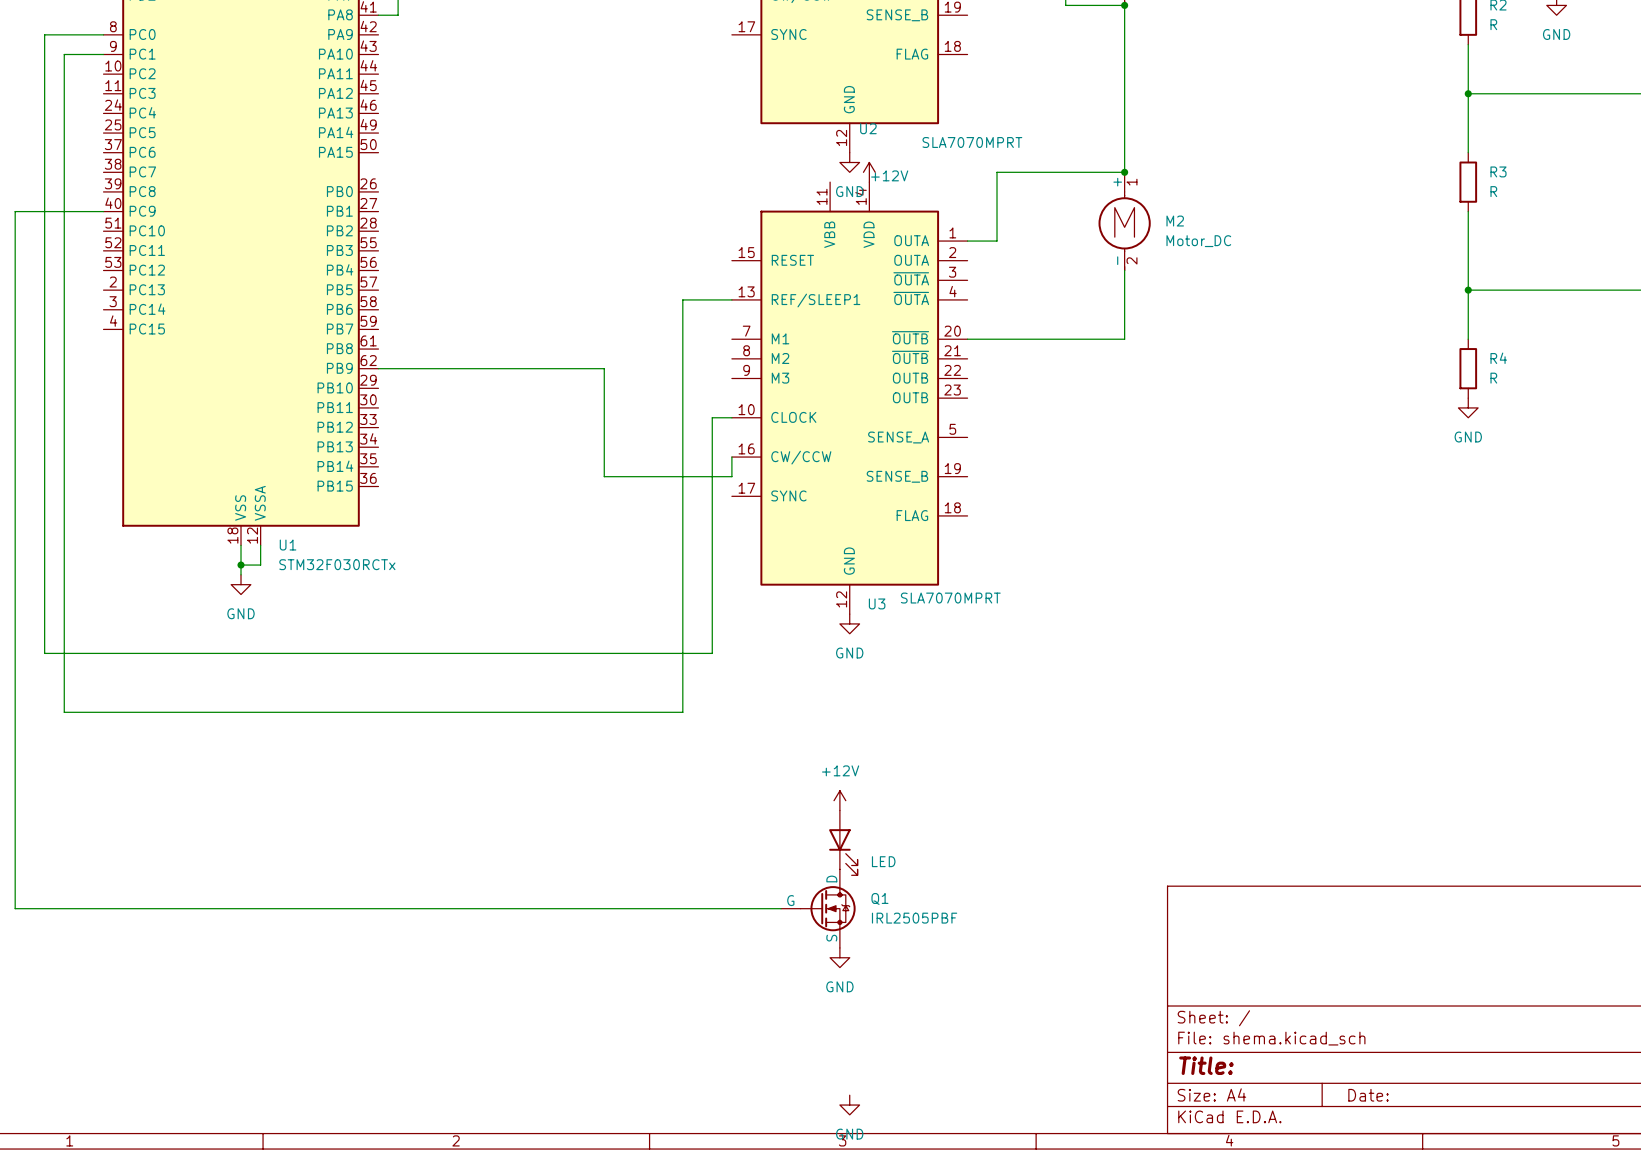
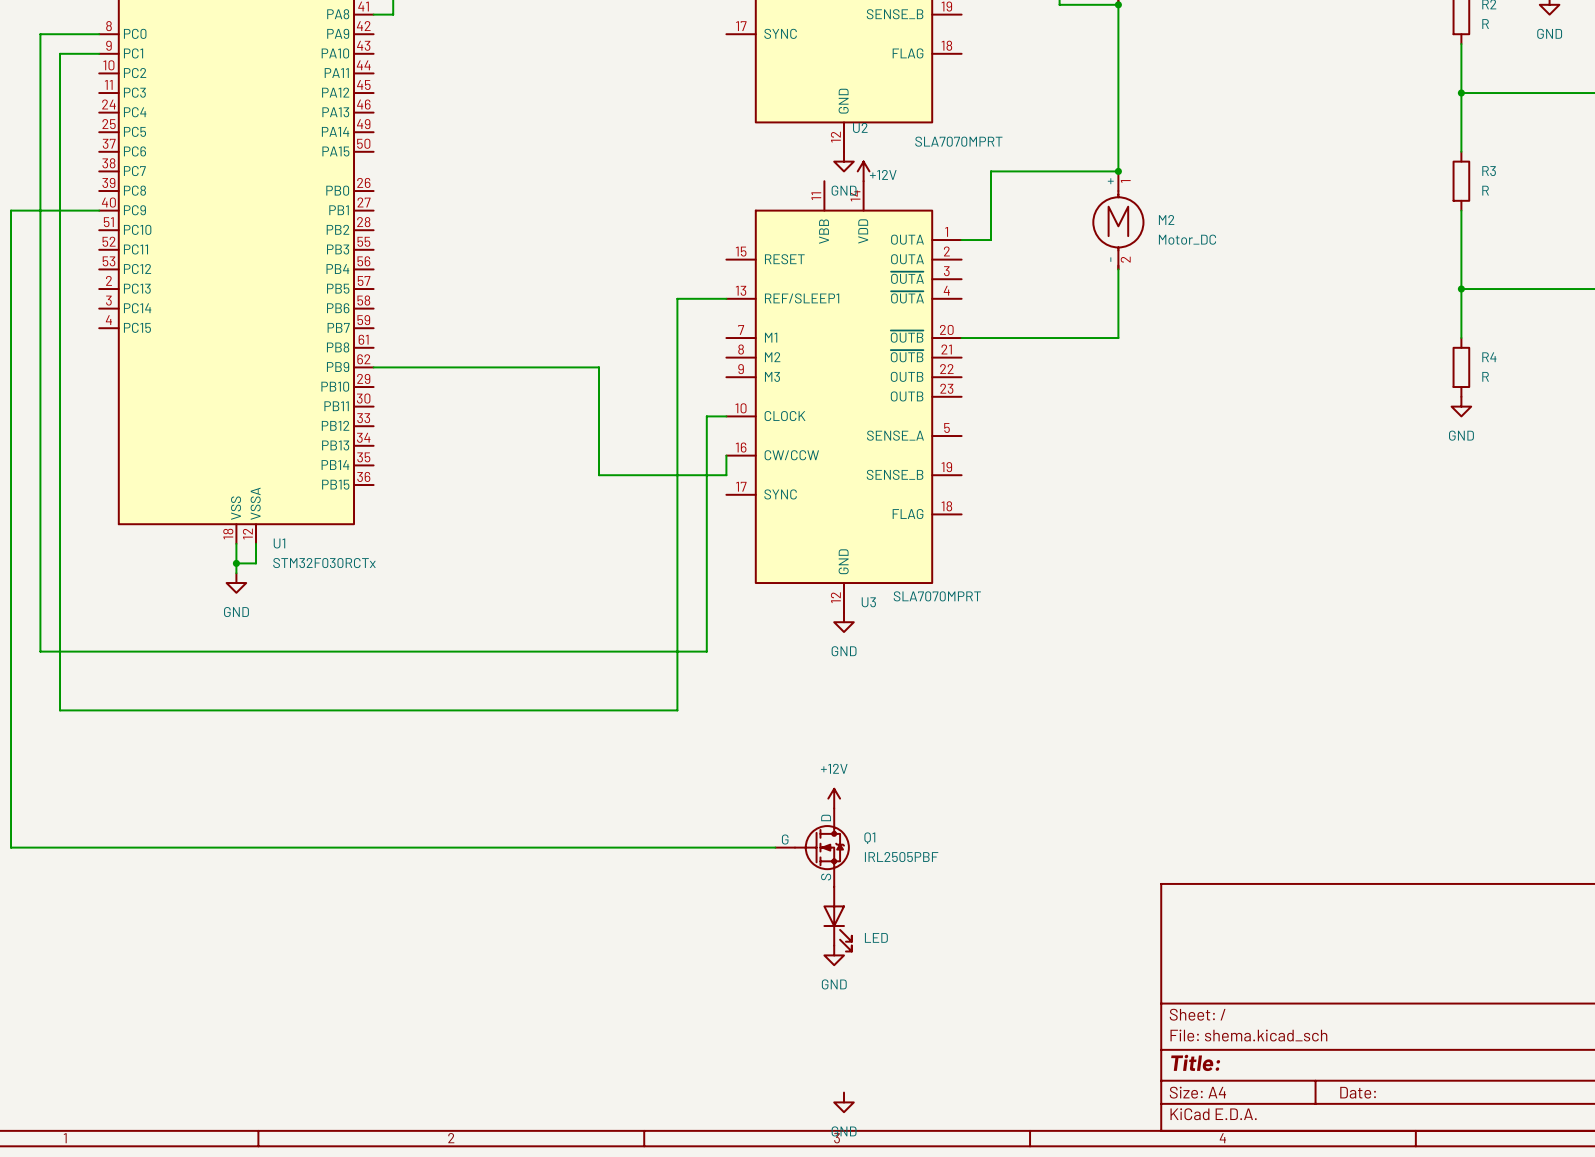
part position: (843, 842) -> (837, 919)
wire: (15, 849) (15, 908) (781, 908) -> (11, 847) (775, 847)
Q1 position: (818, 908) -> (812, 847)

